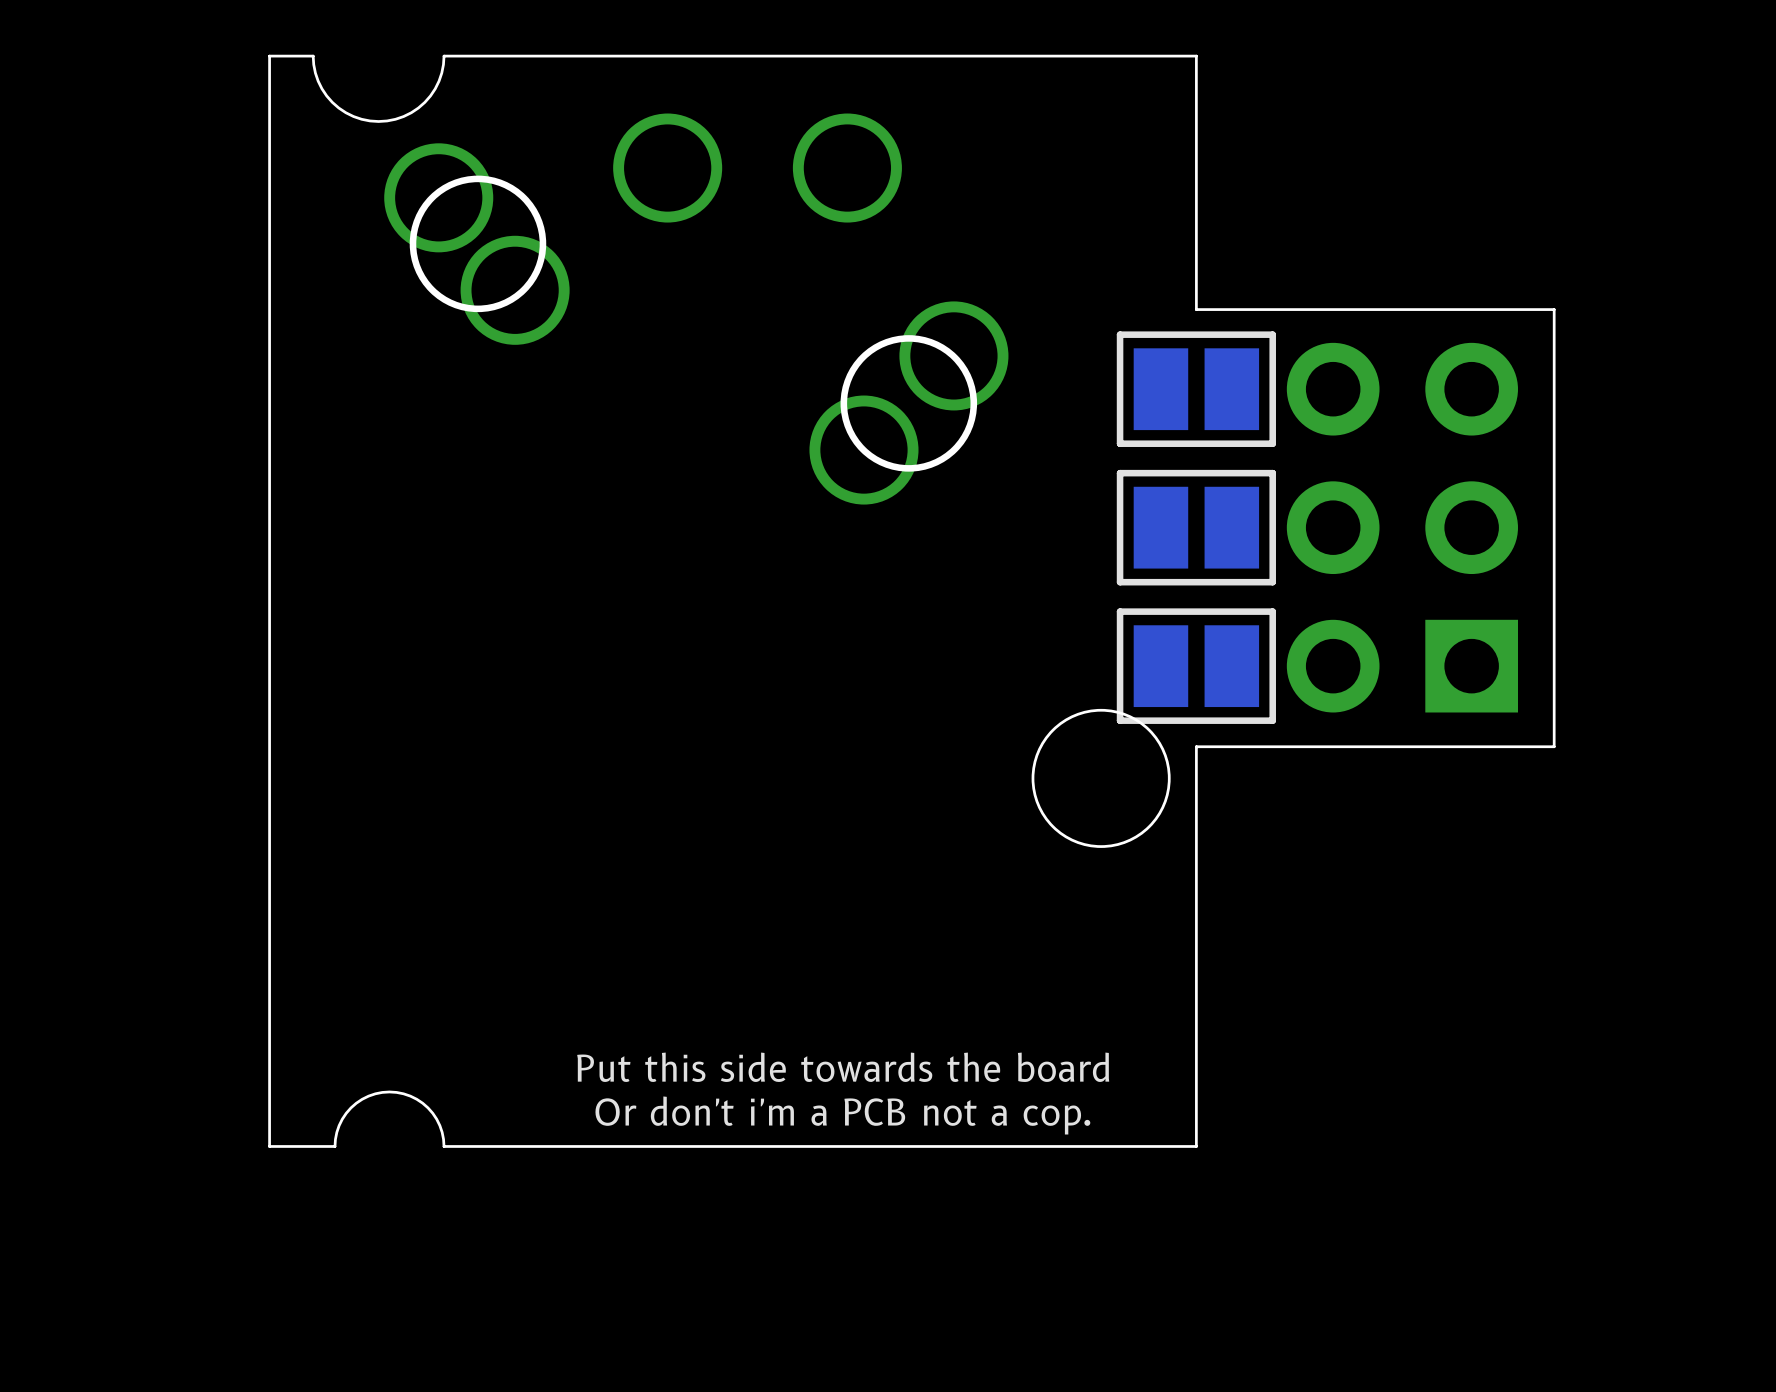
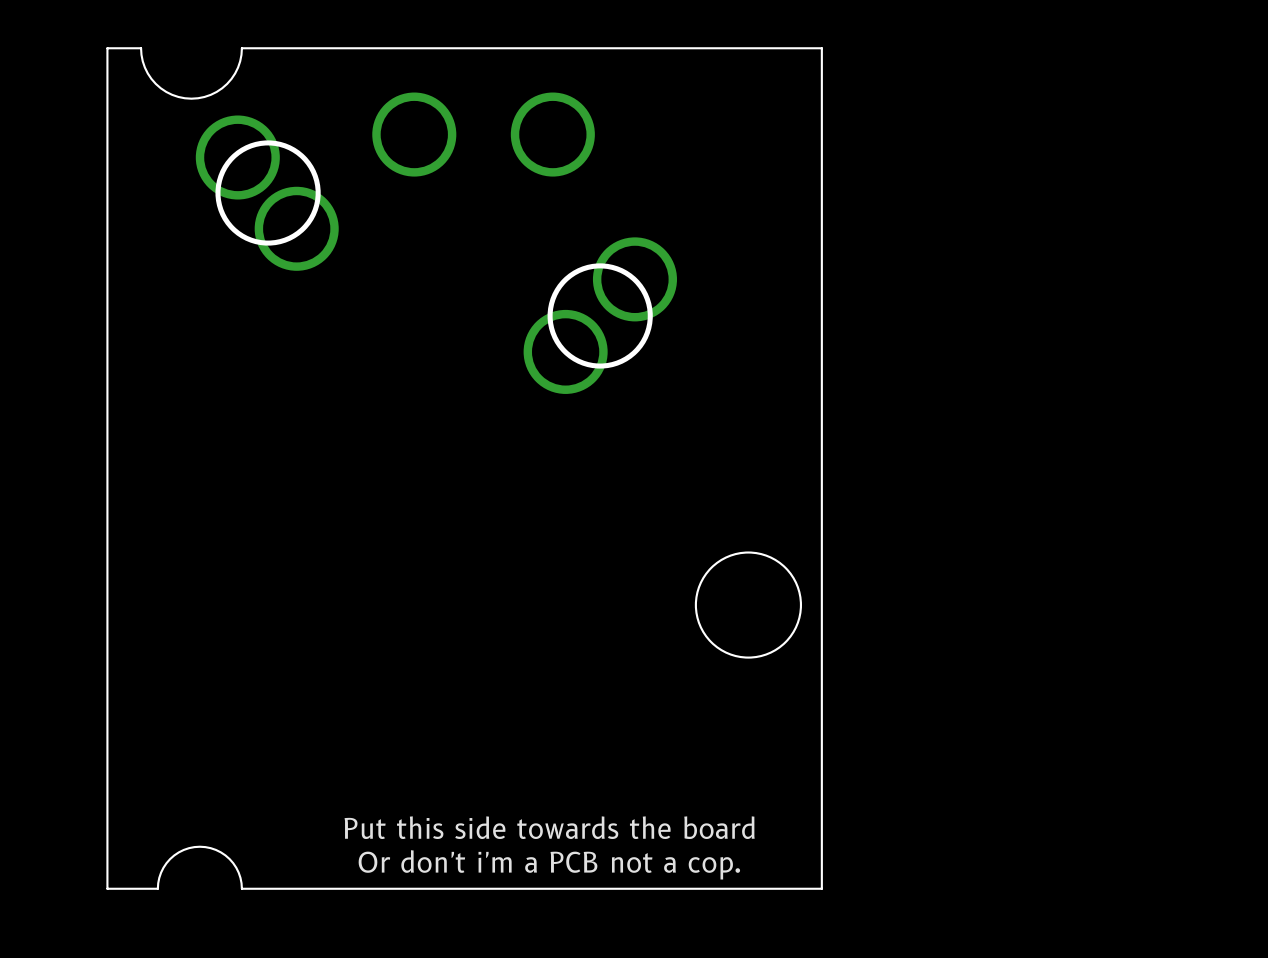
board edge: (1196, 309) (1554, 309) (1554, 746) (1196, 746) (1196, 1146) -> (821, 243) (821, 888)
part: (1196, 389) -> none
part: (1196, 527) -> none
part: (1402, 527) -> none
part: (1196, 666) -> none

